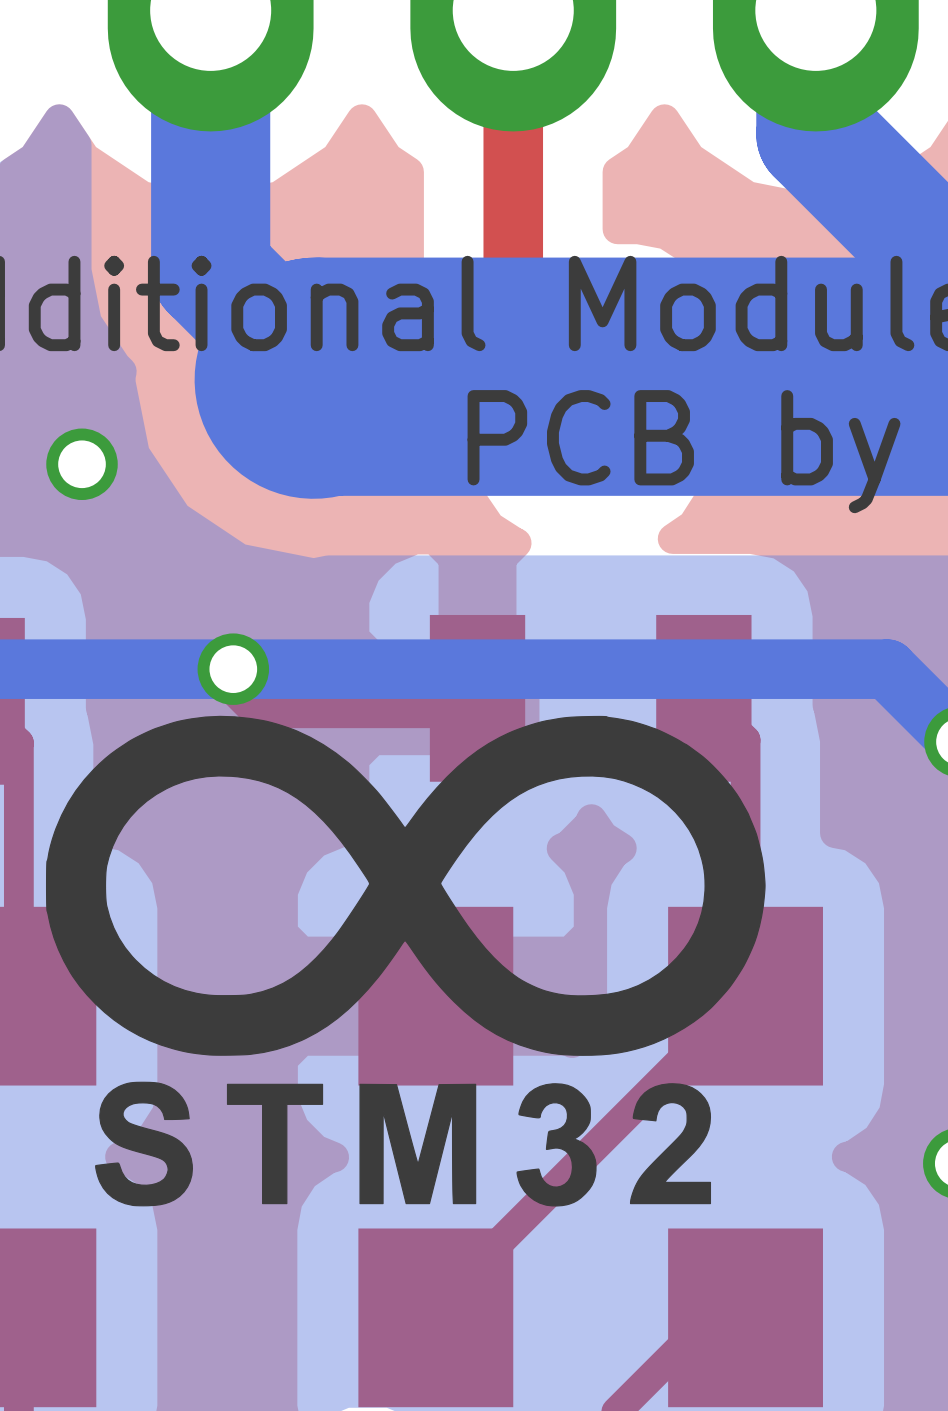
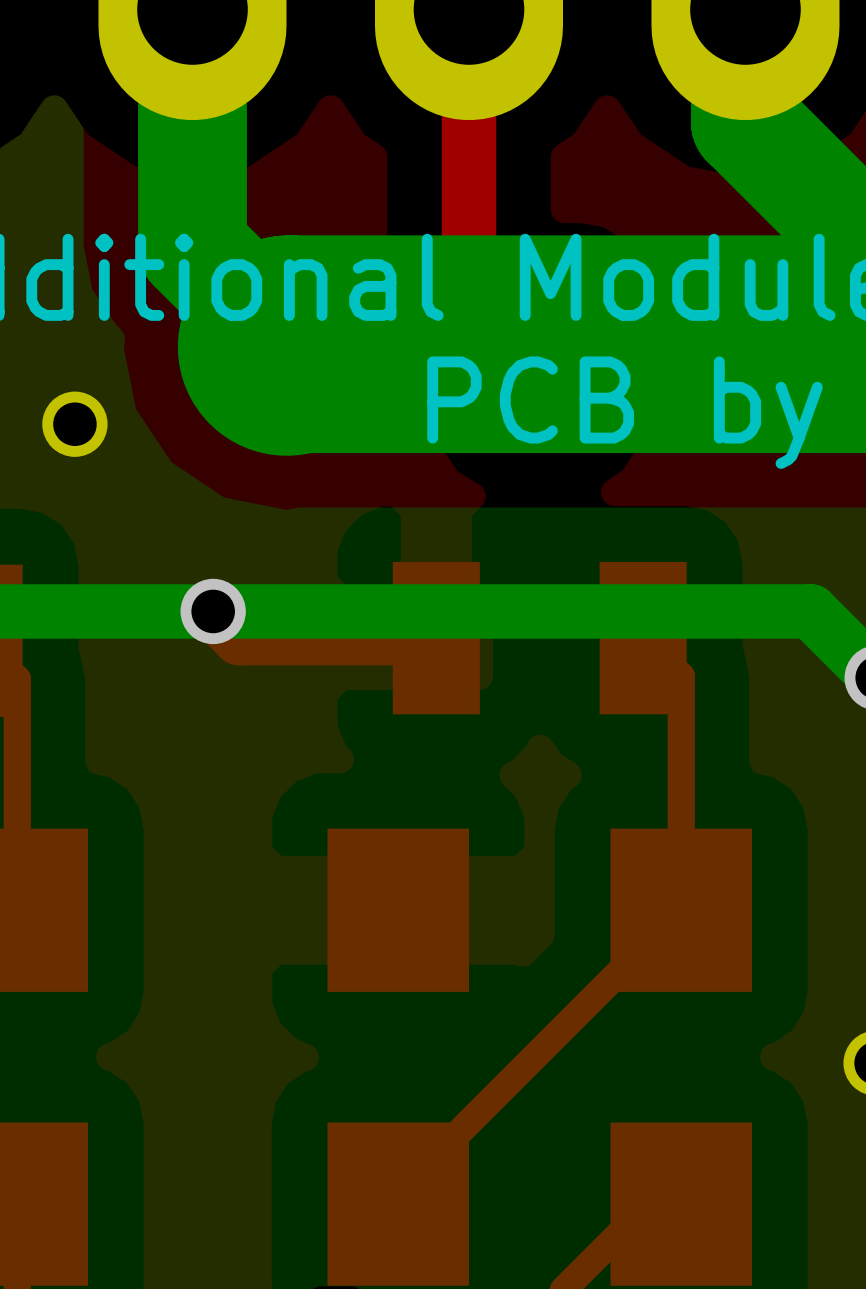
drawing: [45, 715, 766, 1207] -> none

